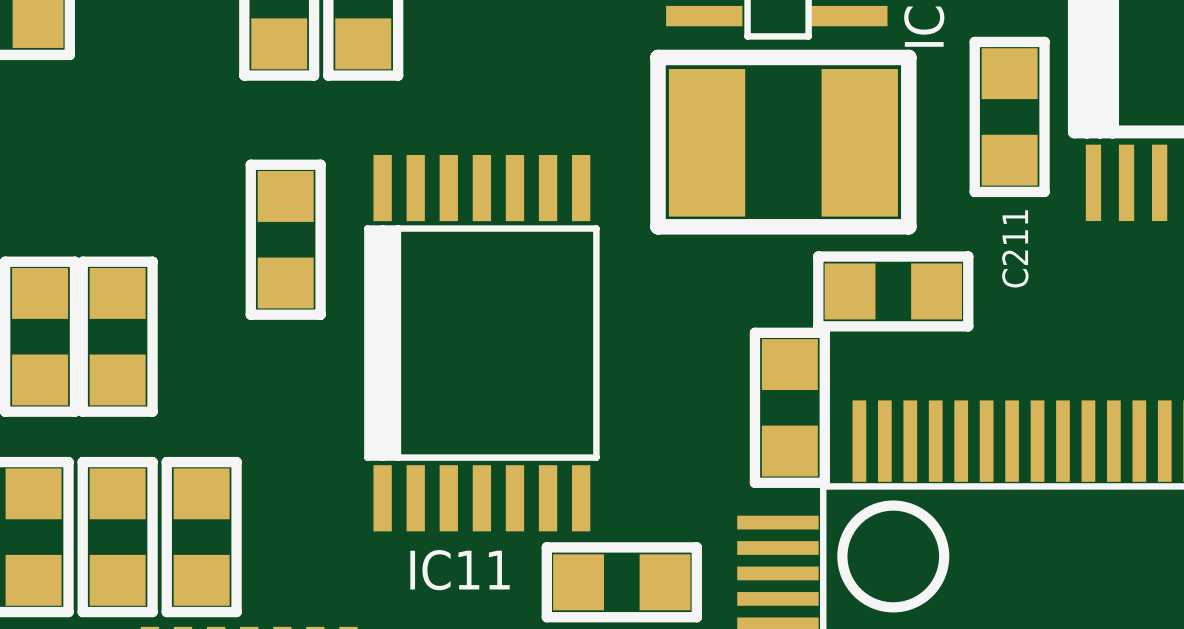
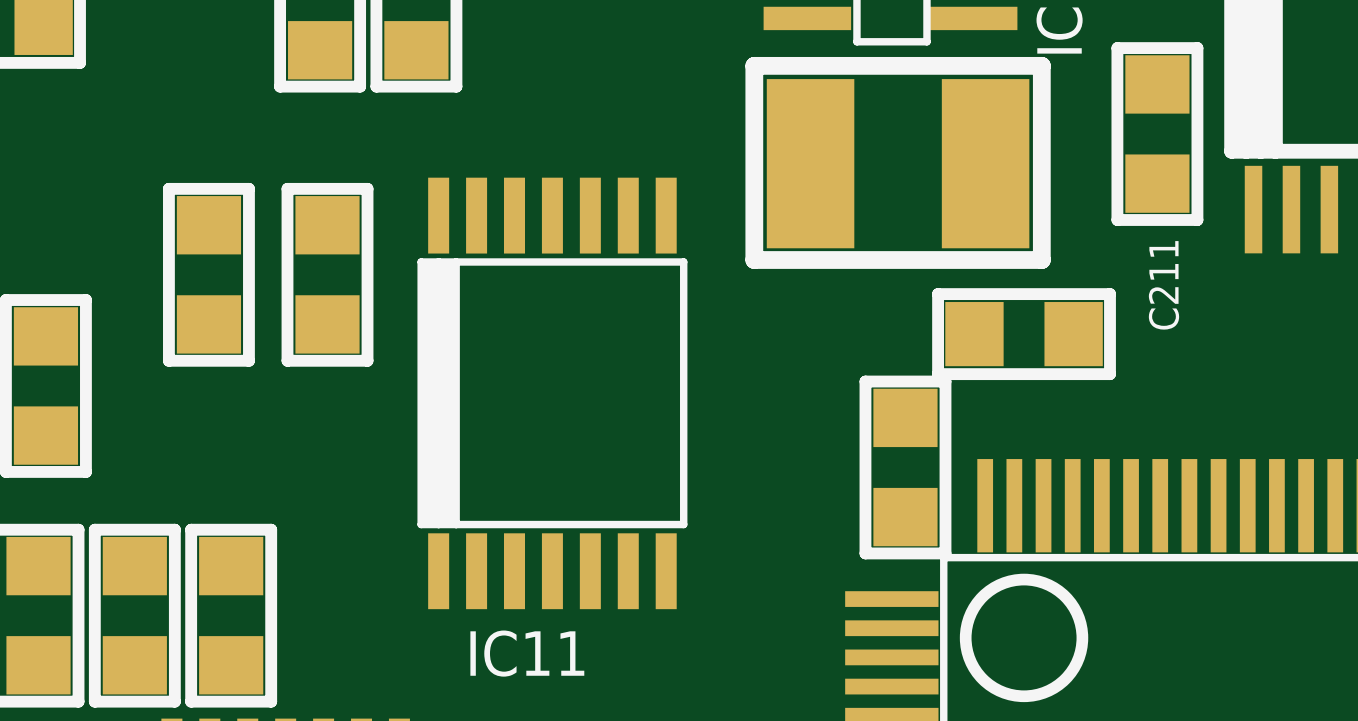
part position: (117, 336) -> (208, 274)
part: (621, 582) -> none

